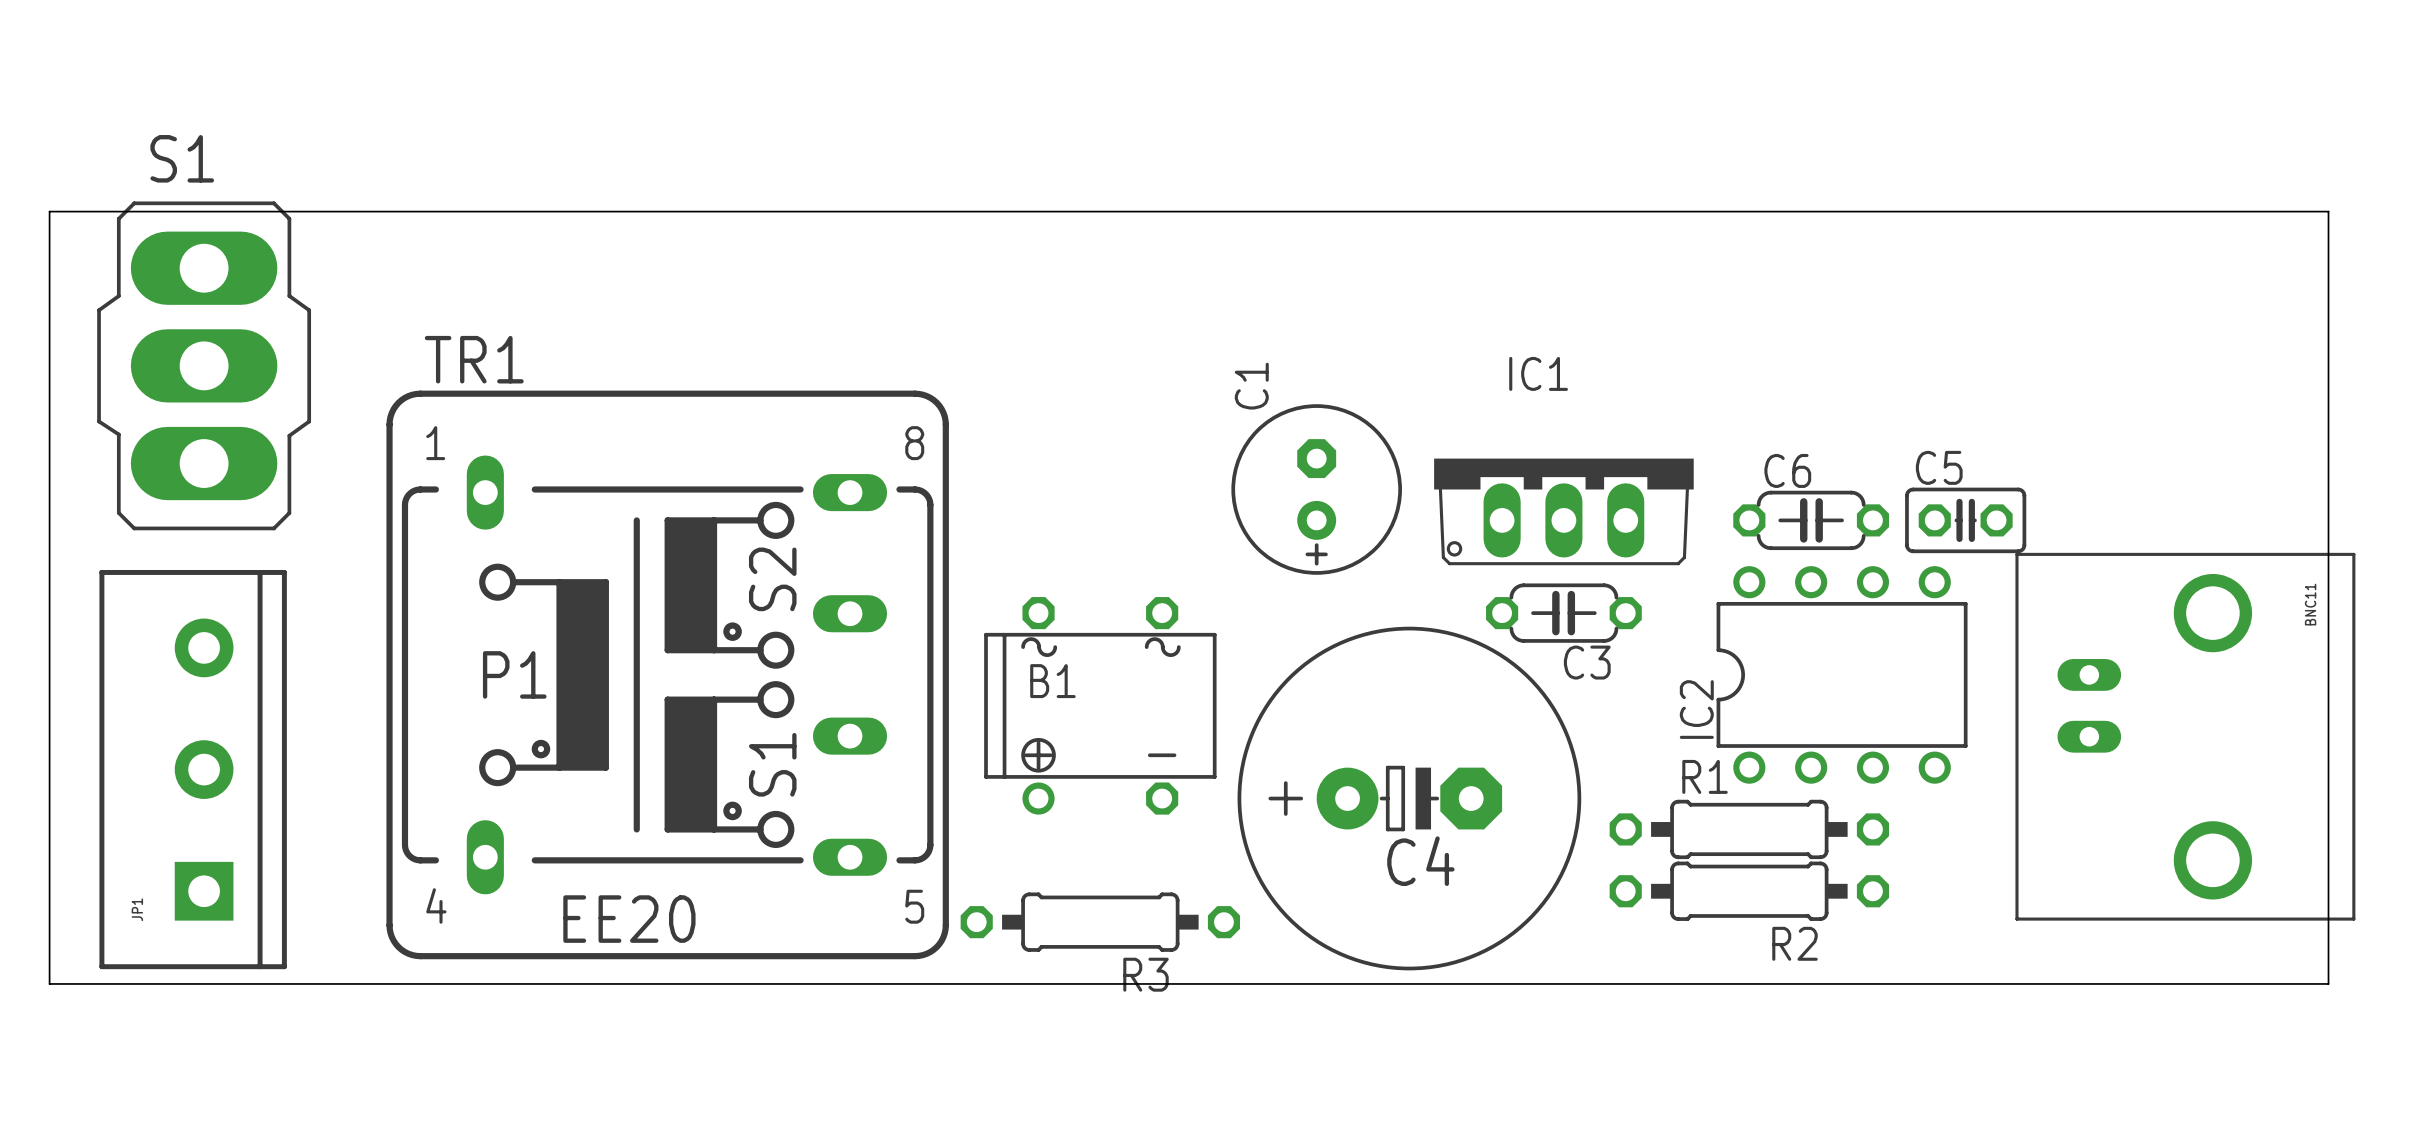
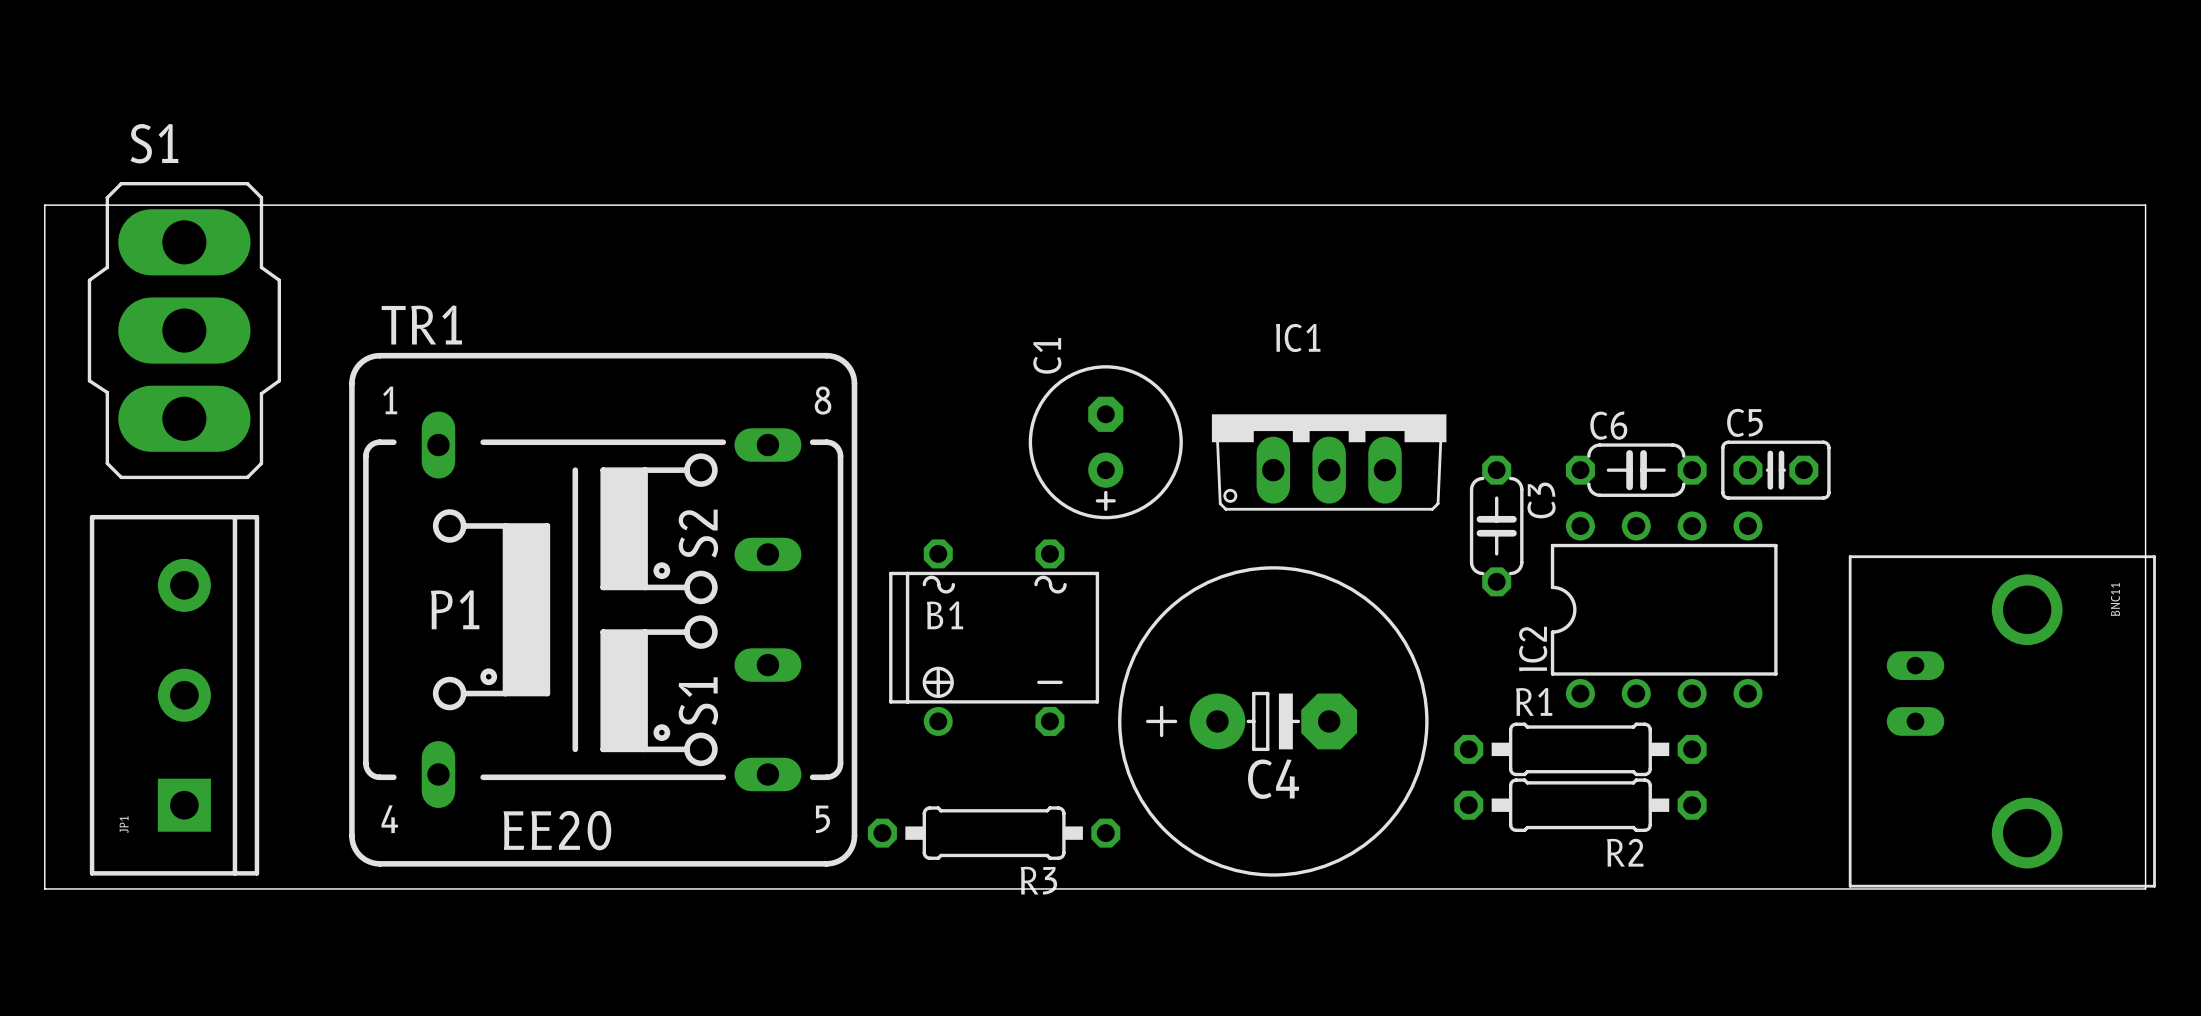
board edge: (49, 227) (49, 211) (2328, 211) (2328, 983) -> (44, 205) (2145, 205) (2145, 888) (2103, 888)
C1 position: (1316, 489) -> (1105, 442)
IC1 position: (1563, 511) -> (1329, 462)
C3 rotation: 0° (1563, 613) -> 90° counterclockwise (1496, 526)
C3 position: (1563, 613) -> (1496, 526)
BNC11 position: (2185, 736) -> (2002, 721)

